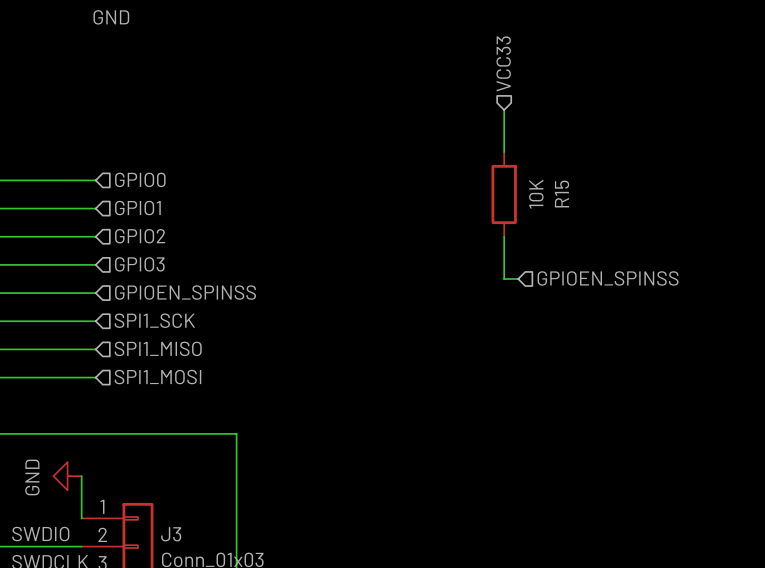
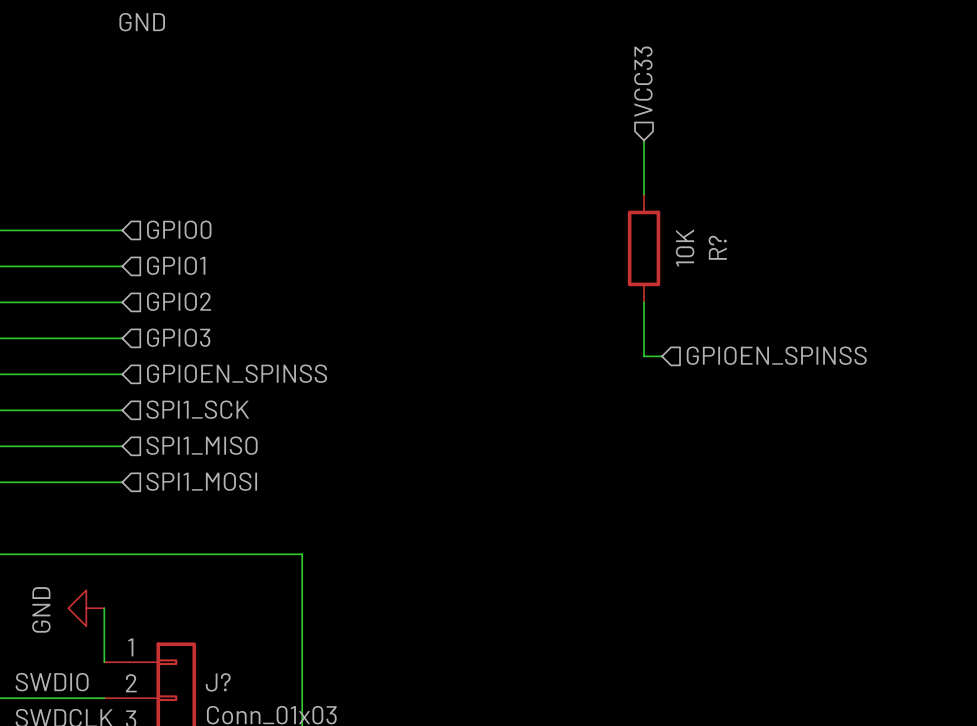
R15 name: R15 (562, 194) -> R? (717, 247)
J3 name: J3 (171, 534) -> J? (218, 682)

